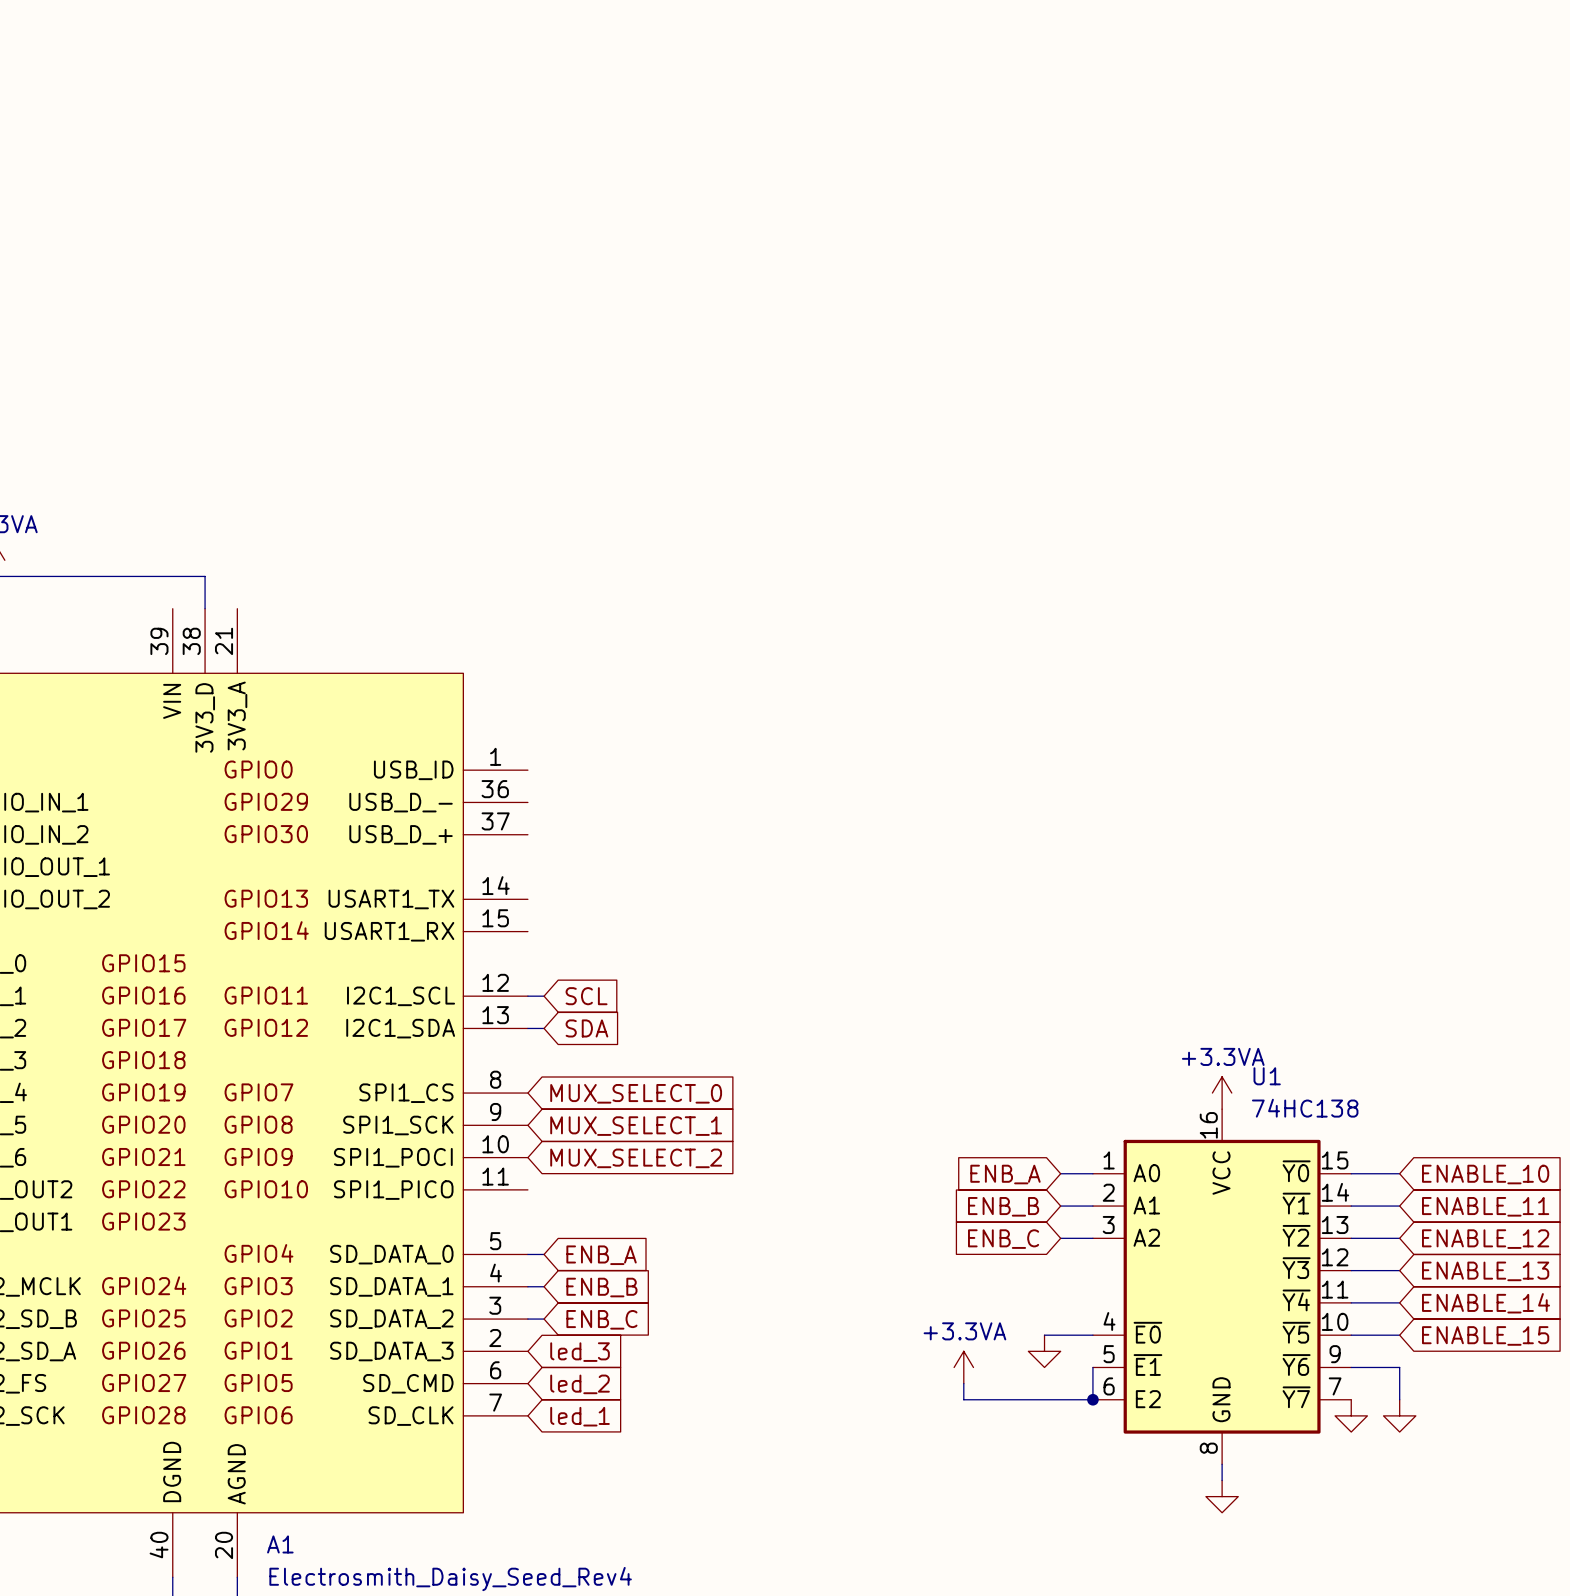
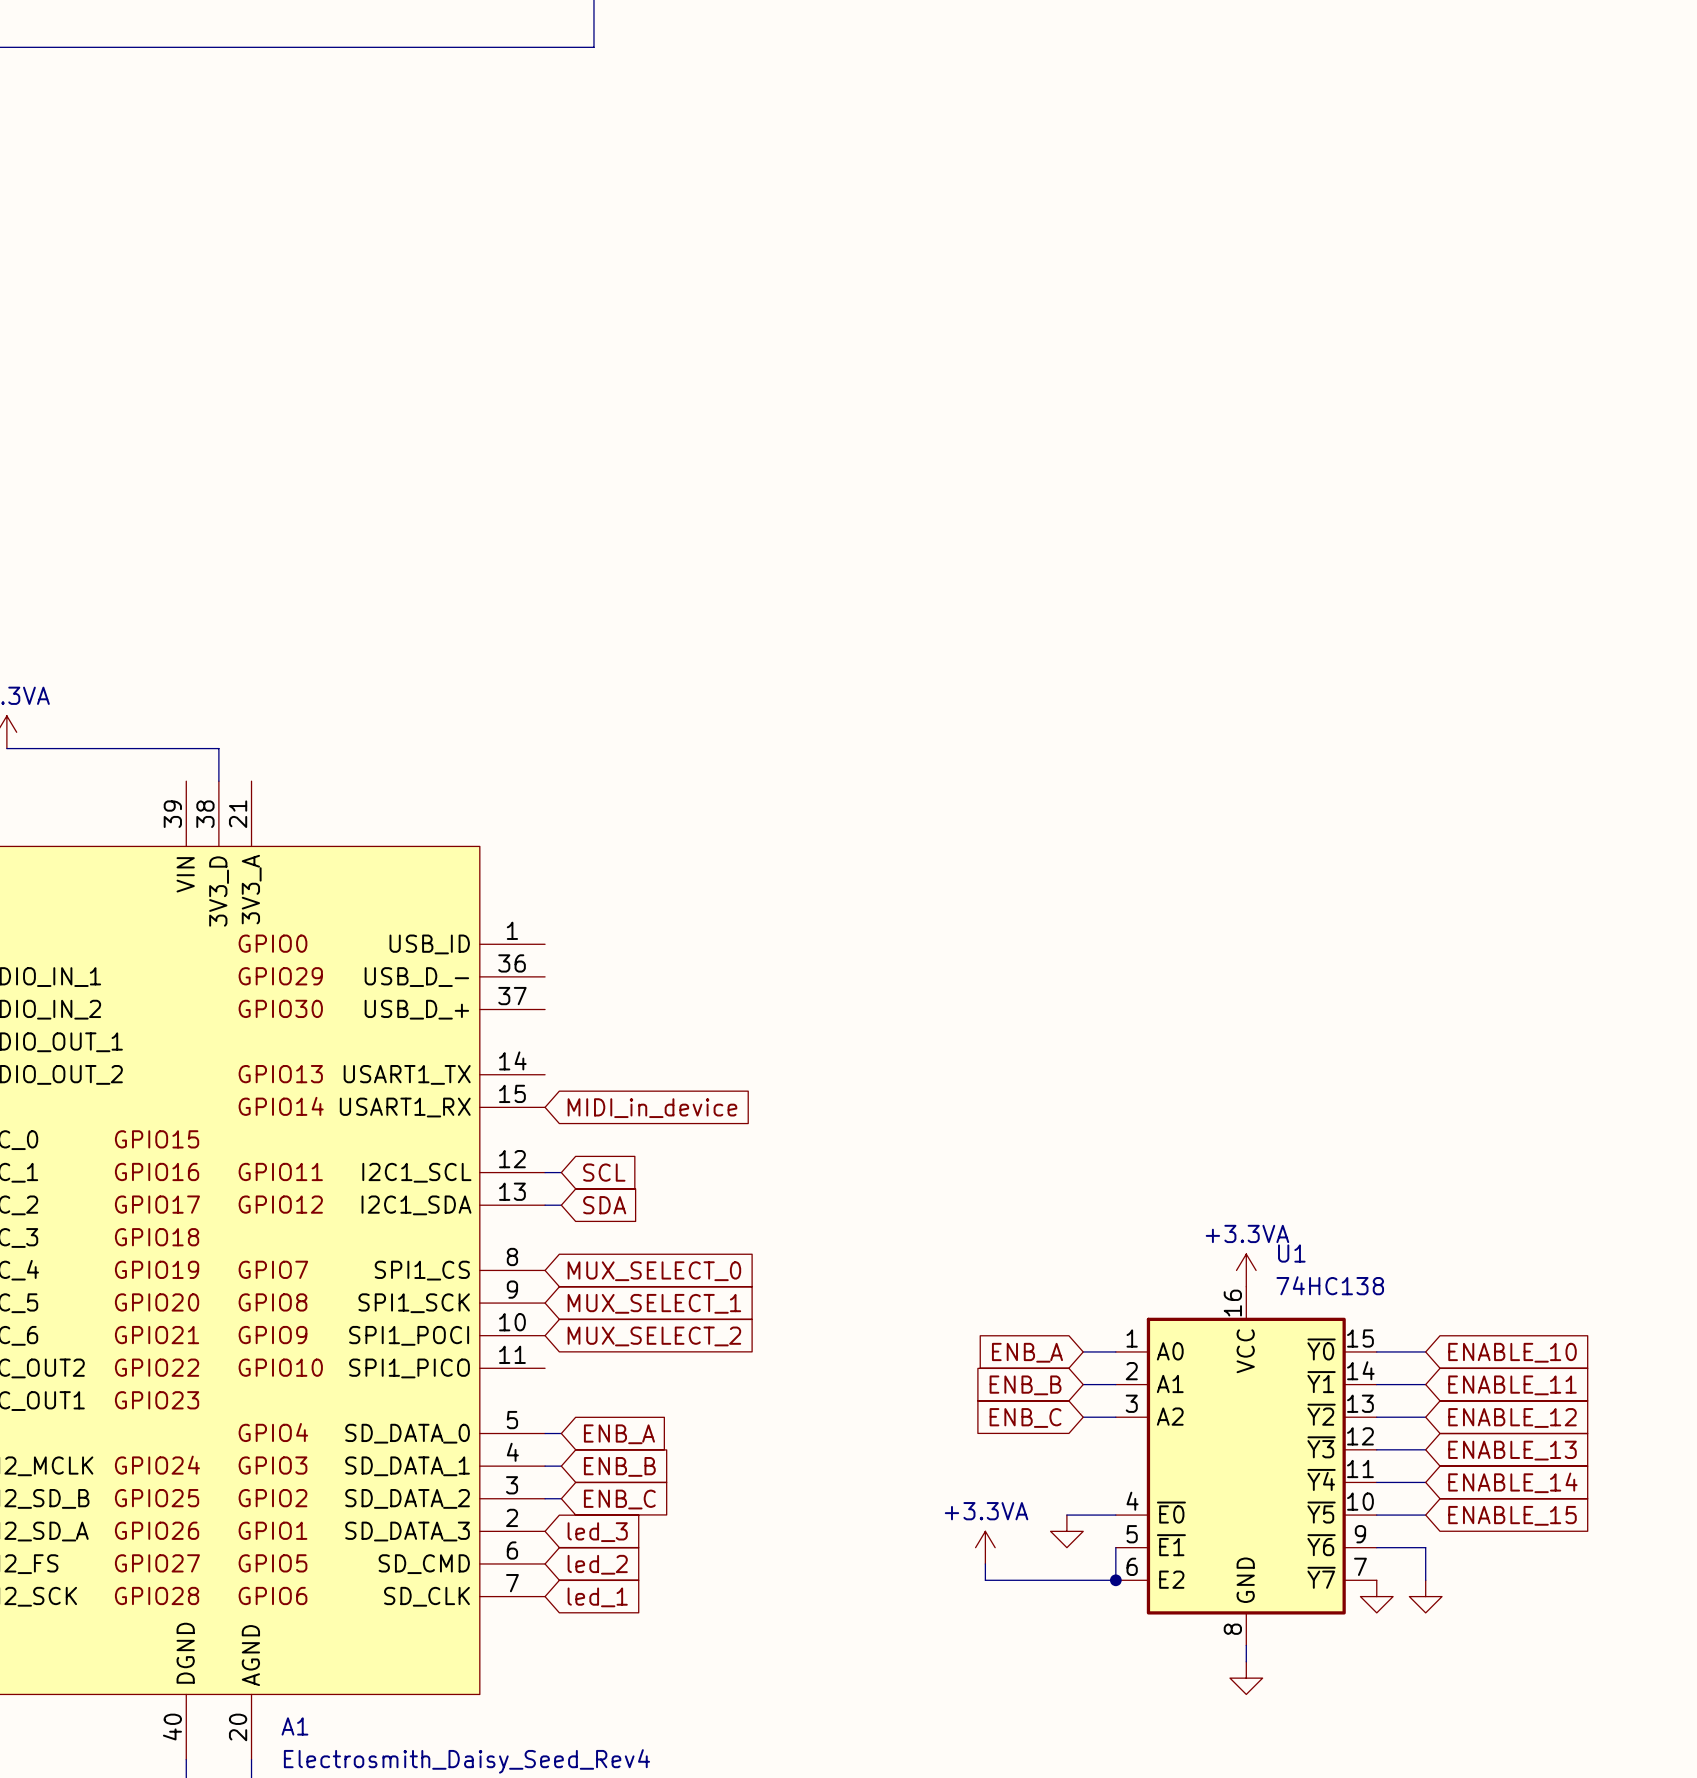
global label: none -> MIDI_in_device (652, 1108)

